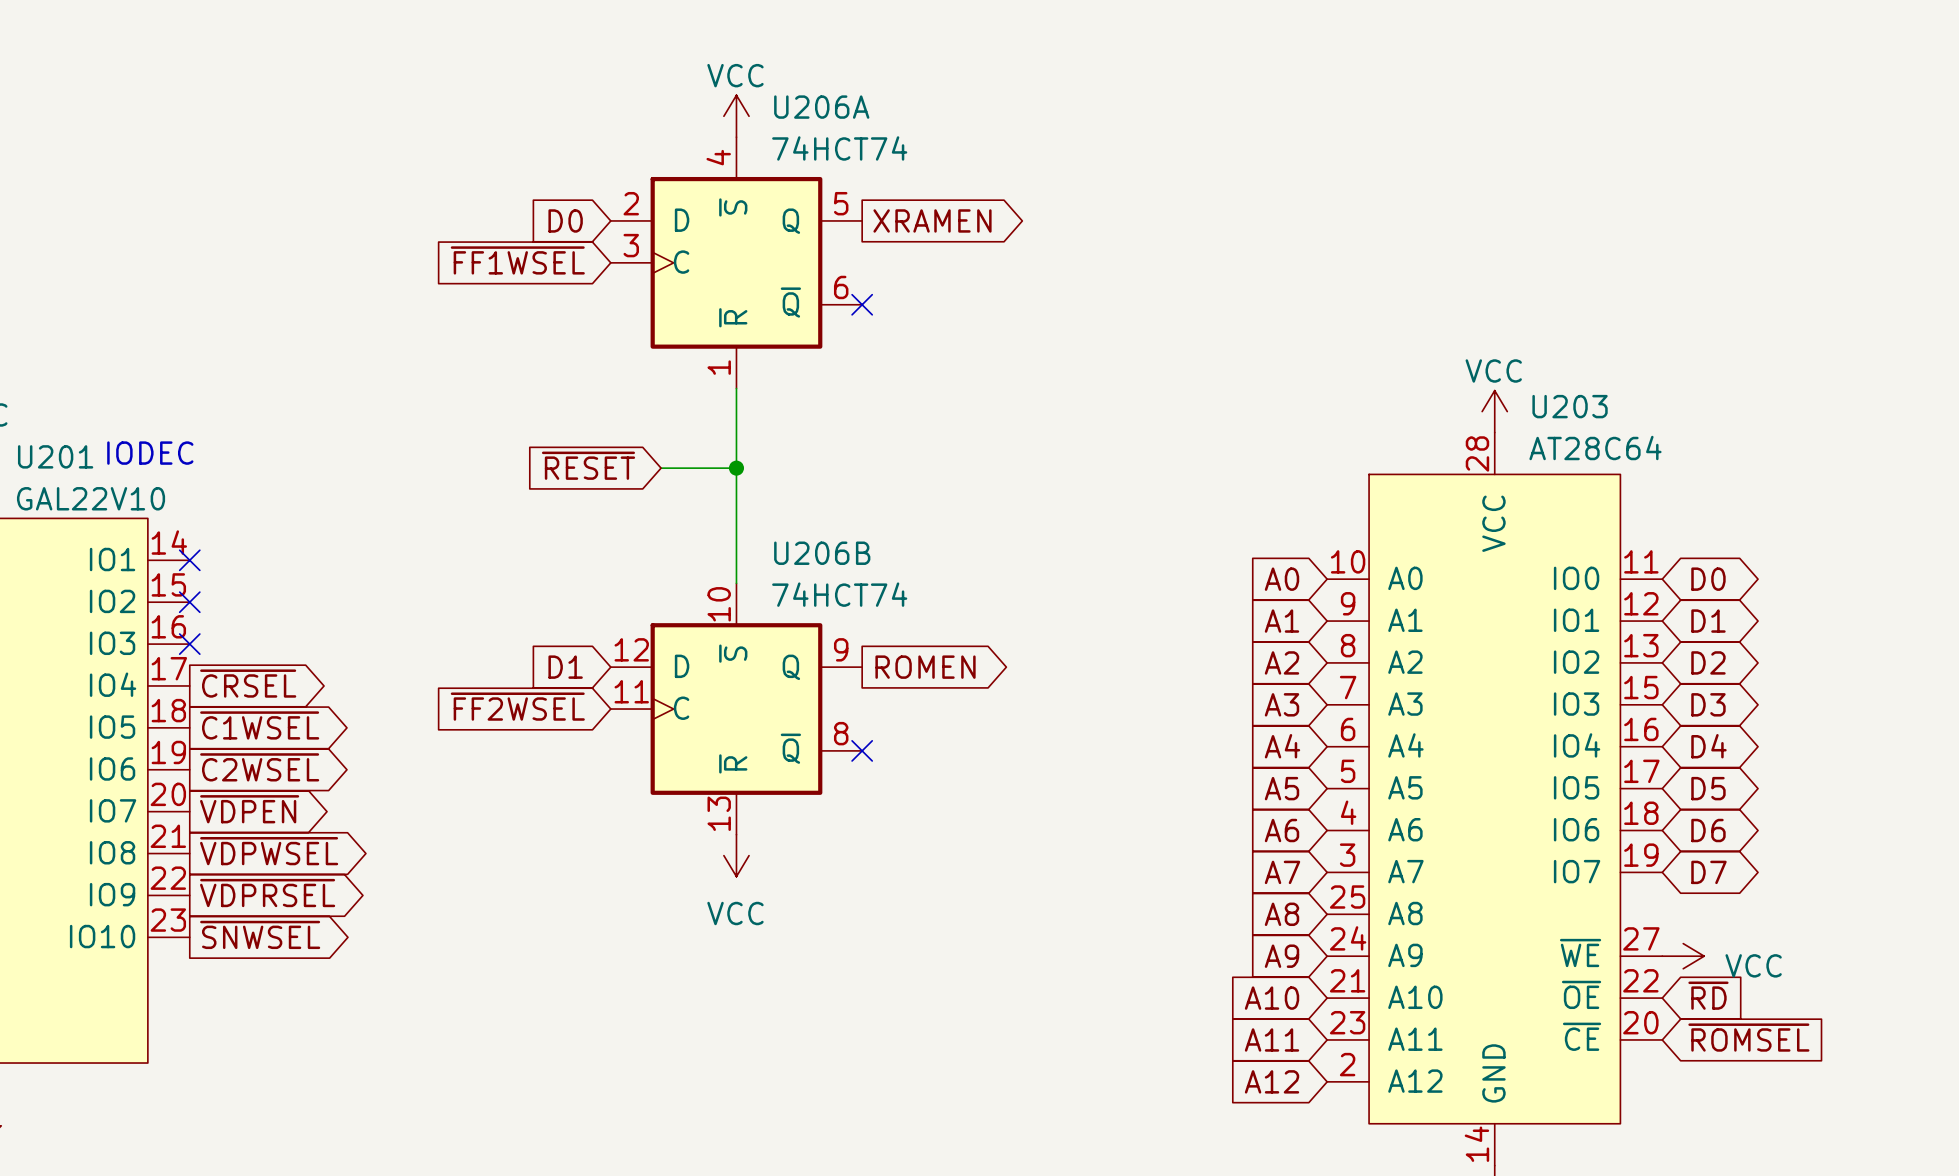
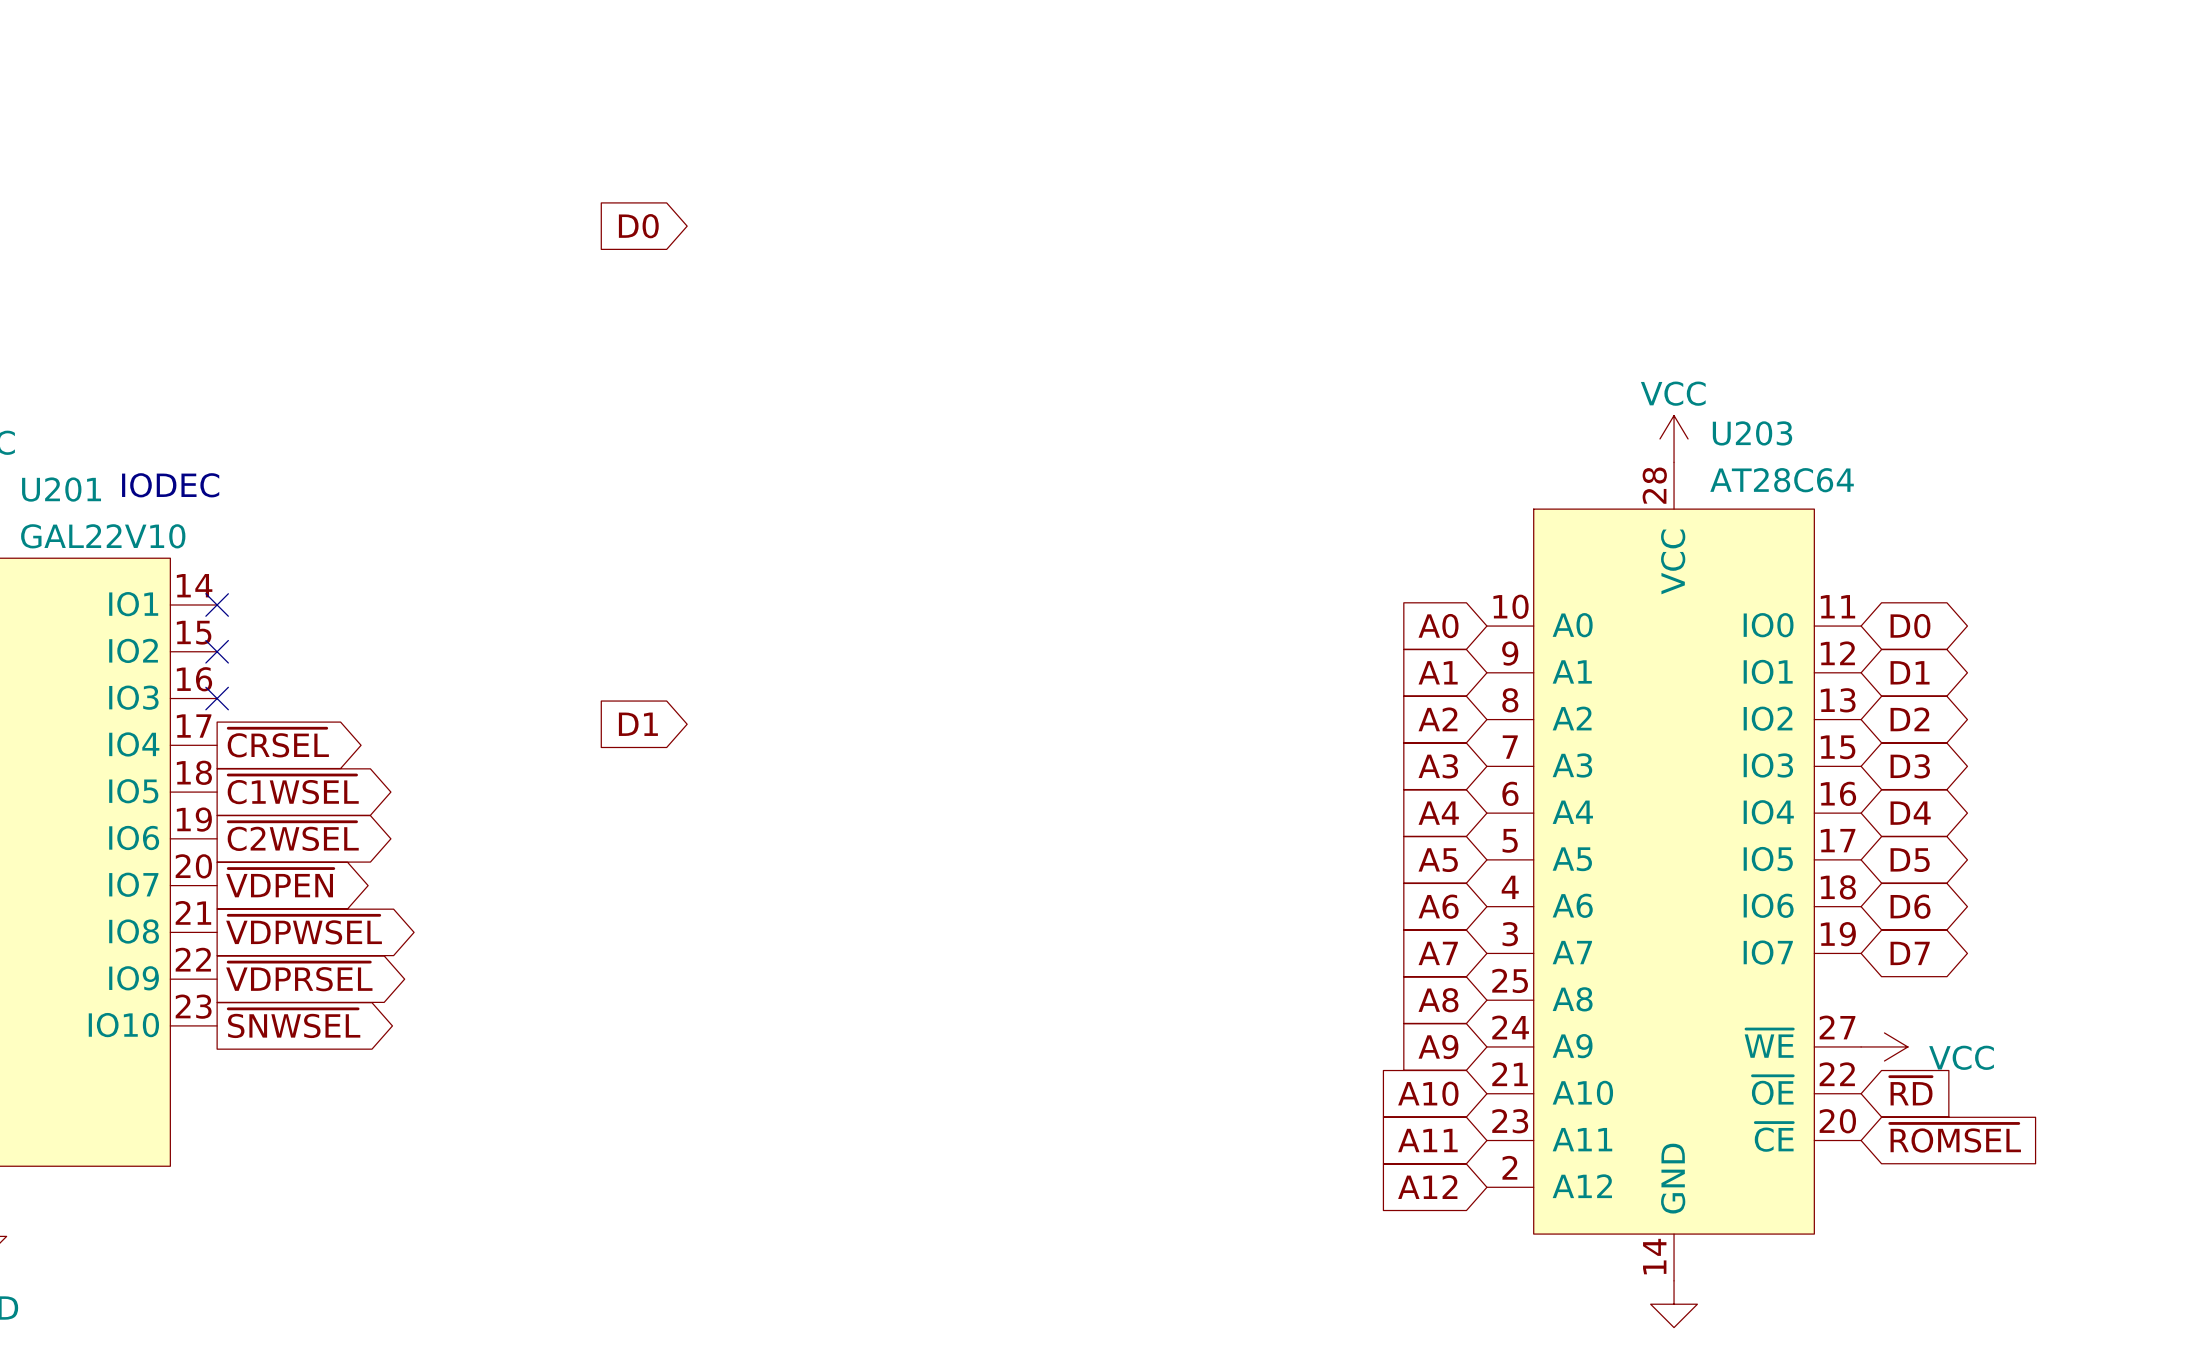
power symbol: VCC (736, 116) -> none
global label: XRAMEN (932, 220) -> none
global label: ~{FF1WSEL} (517, 260) -> none
U206A: 74HCT74 (736, 262) -> none
no-connect mark: (862, 304) -> none
wire: (736, 388) (736, 583) -> none
global label: ~{RESET} (588, 465) -> none
wire: (661, 468) (736, 468) -> none
junction: (736, 468) -> none
global label: ROMEN (925, 667) -> none
global label: ~{FF2WSEL} (517, 706) -> none
U206B: 74HCT74 (736, 709) -> none
no-connect mark: (862, 750) -> none
power symbol: VCC (736, 855) -> none

